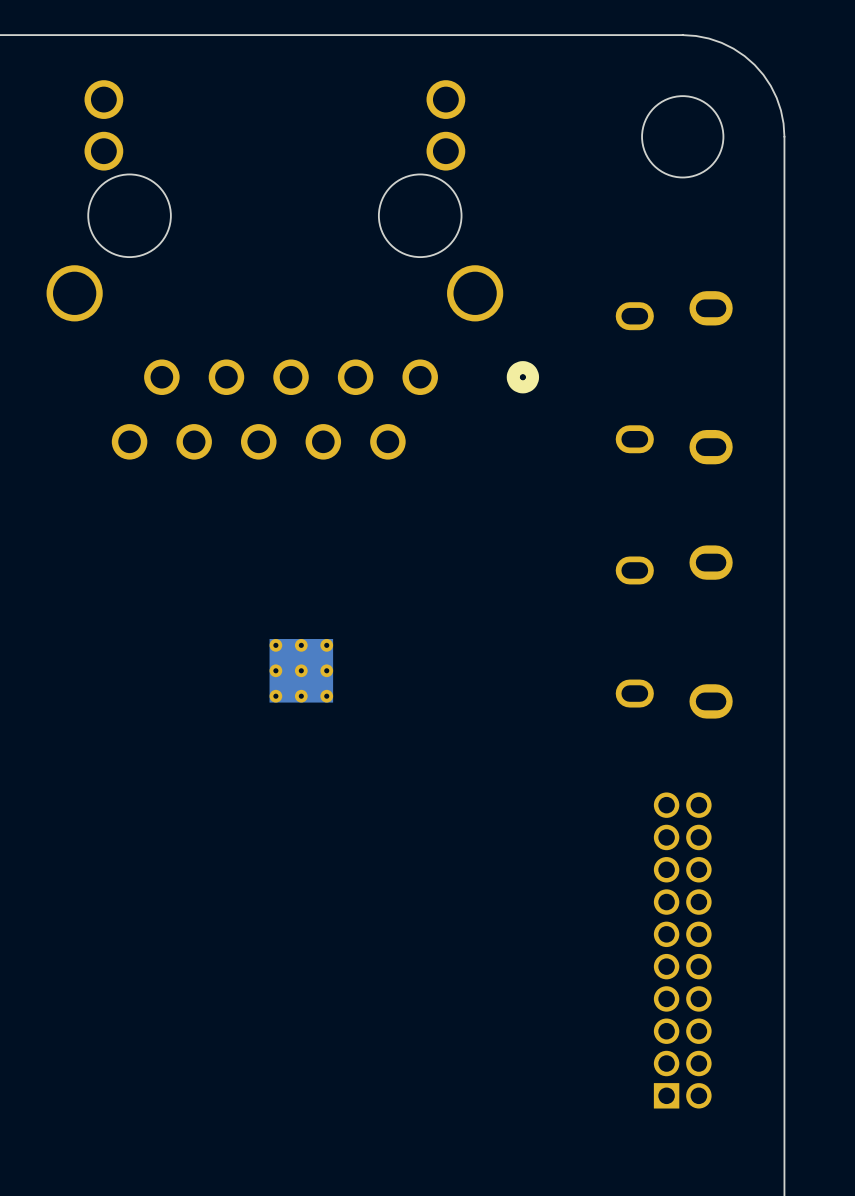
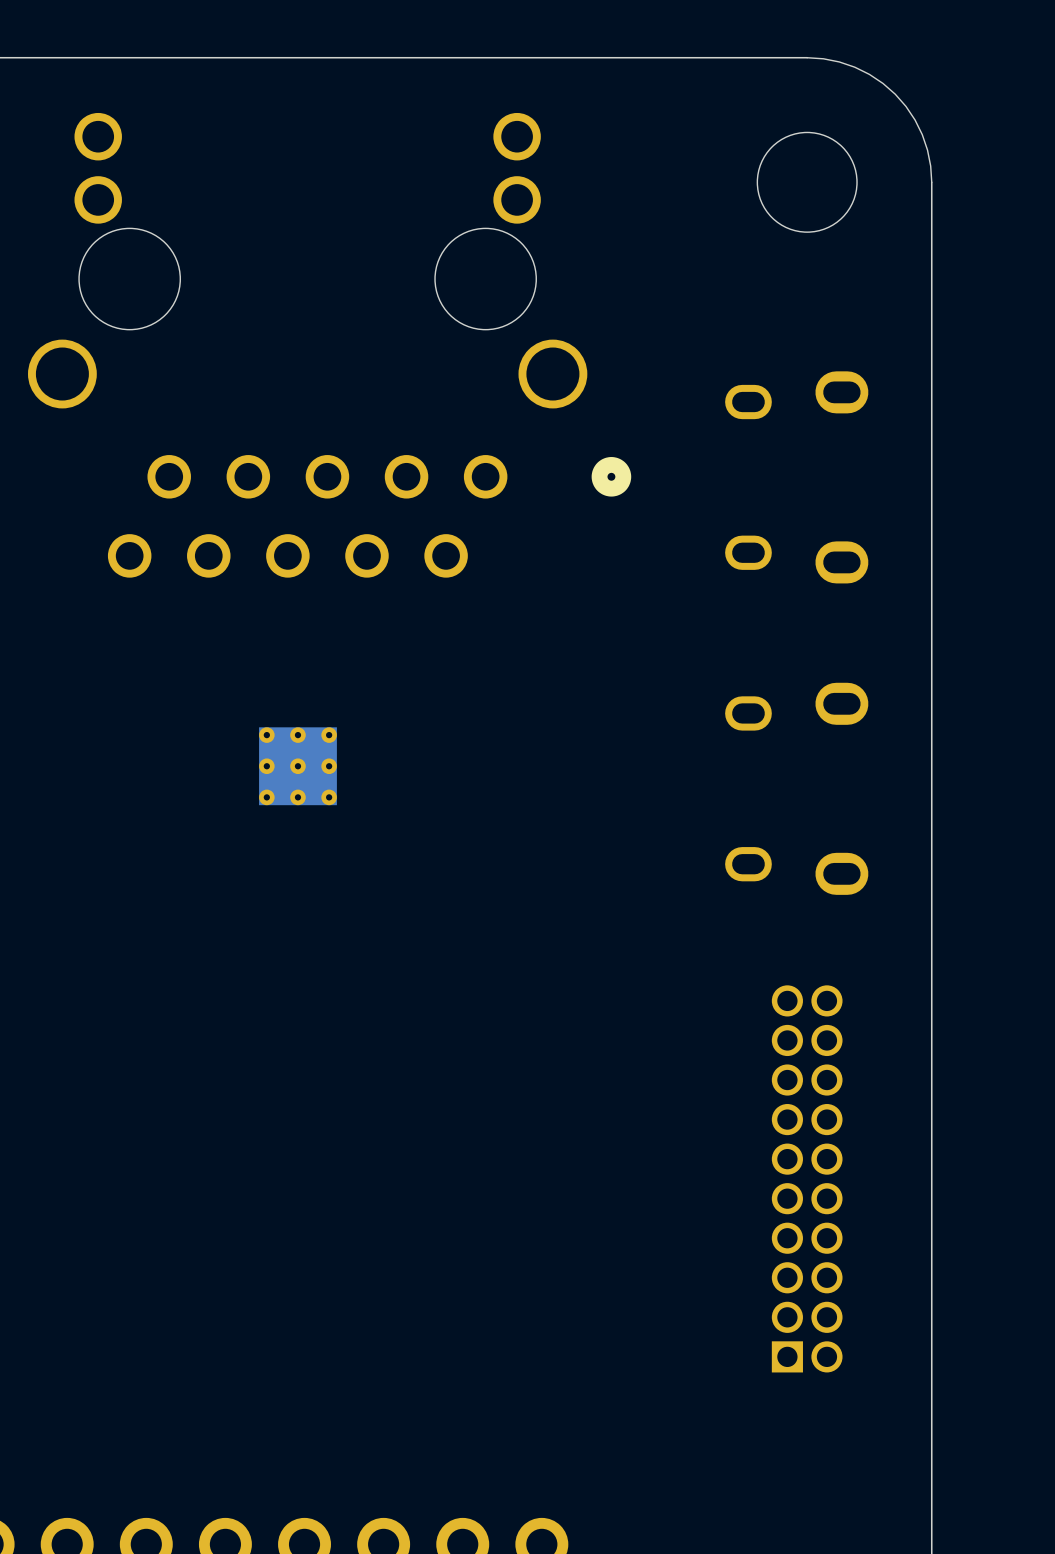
part position: (301, 670) -> (297, 766)

